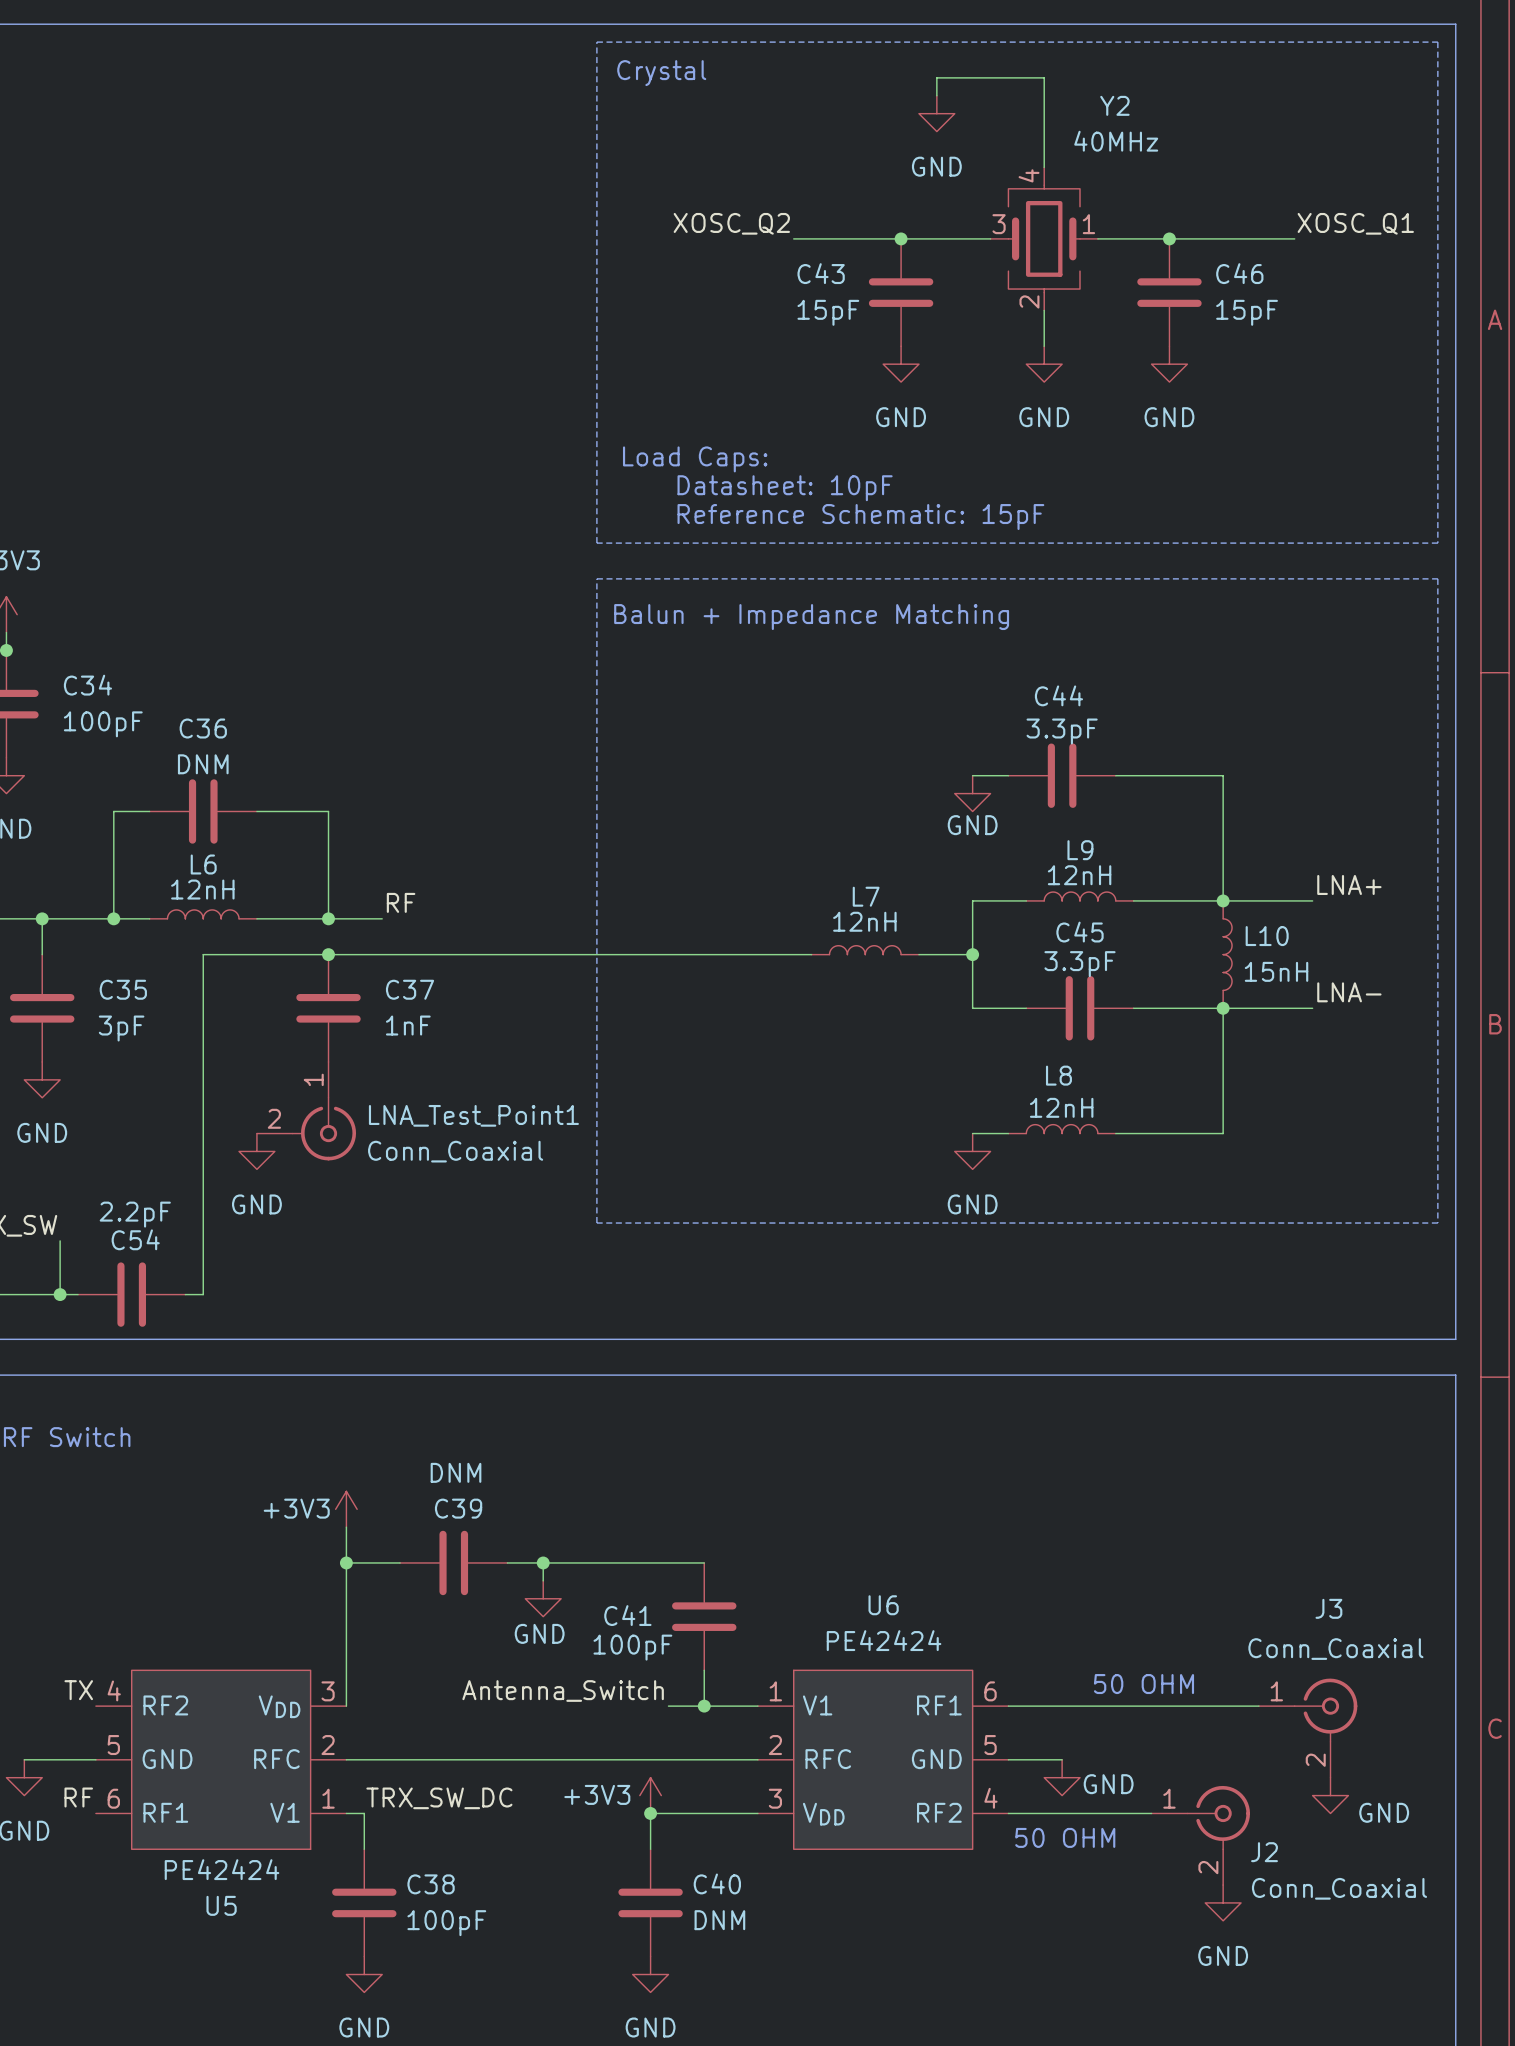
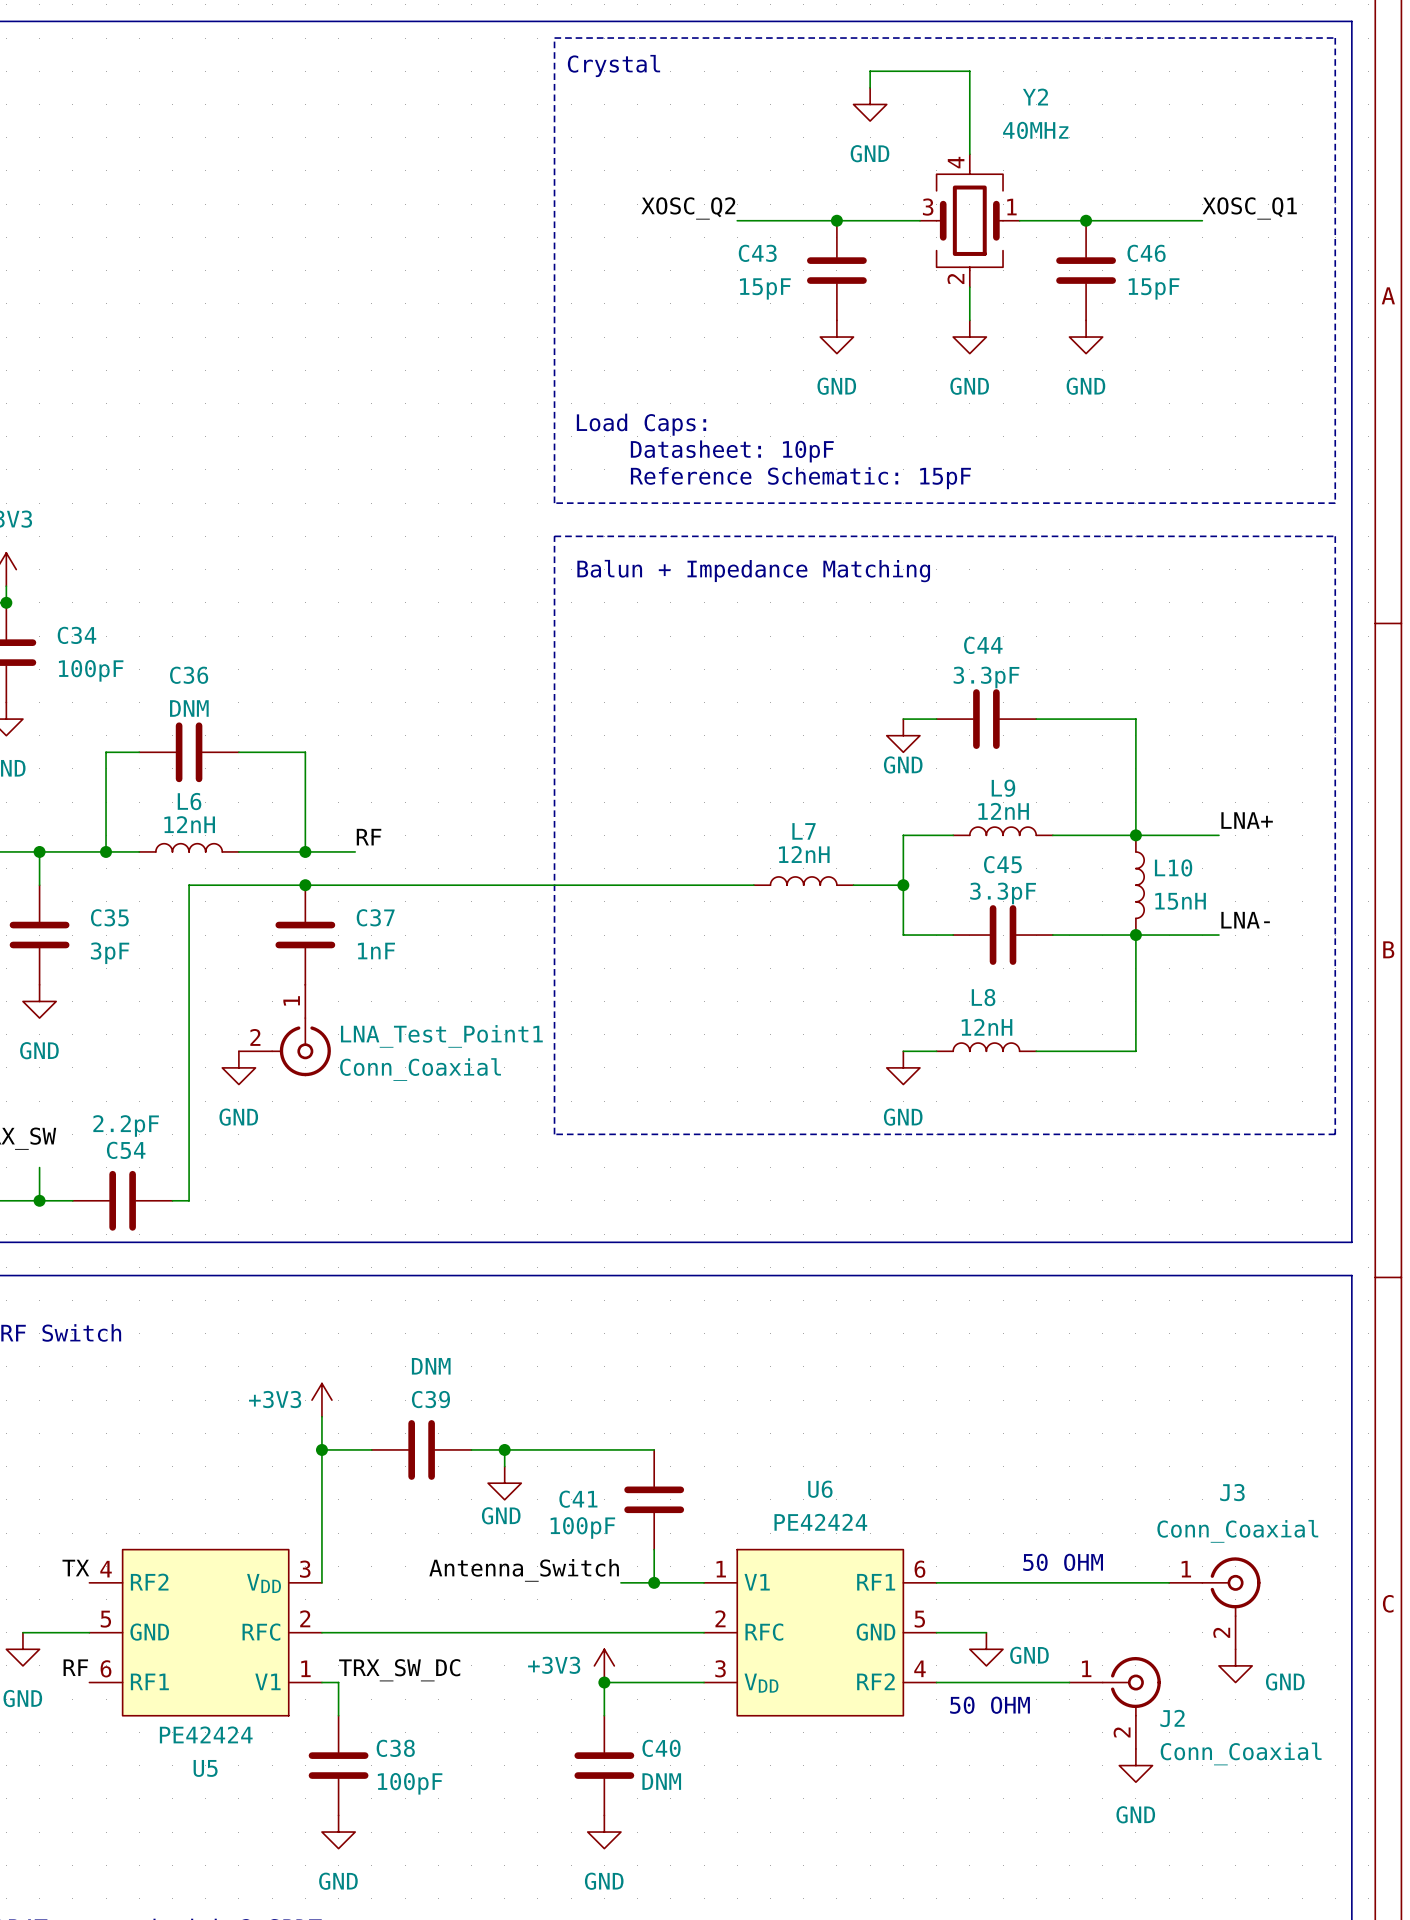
wire: (60, 1240) (60, 1294) -> none
wire: none -> (39, 1167) (39, 1200)
junction position: (60, 1294) -> (39, 1200)

